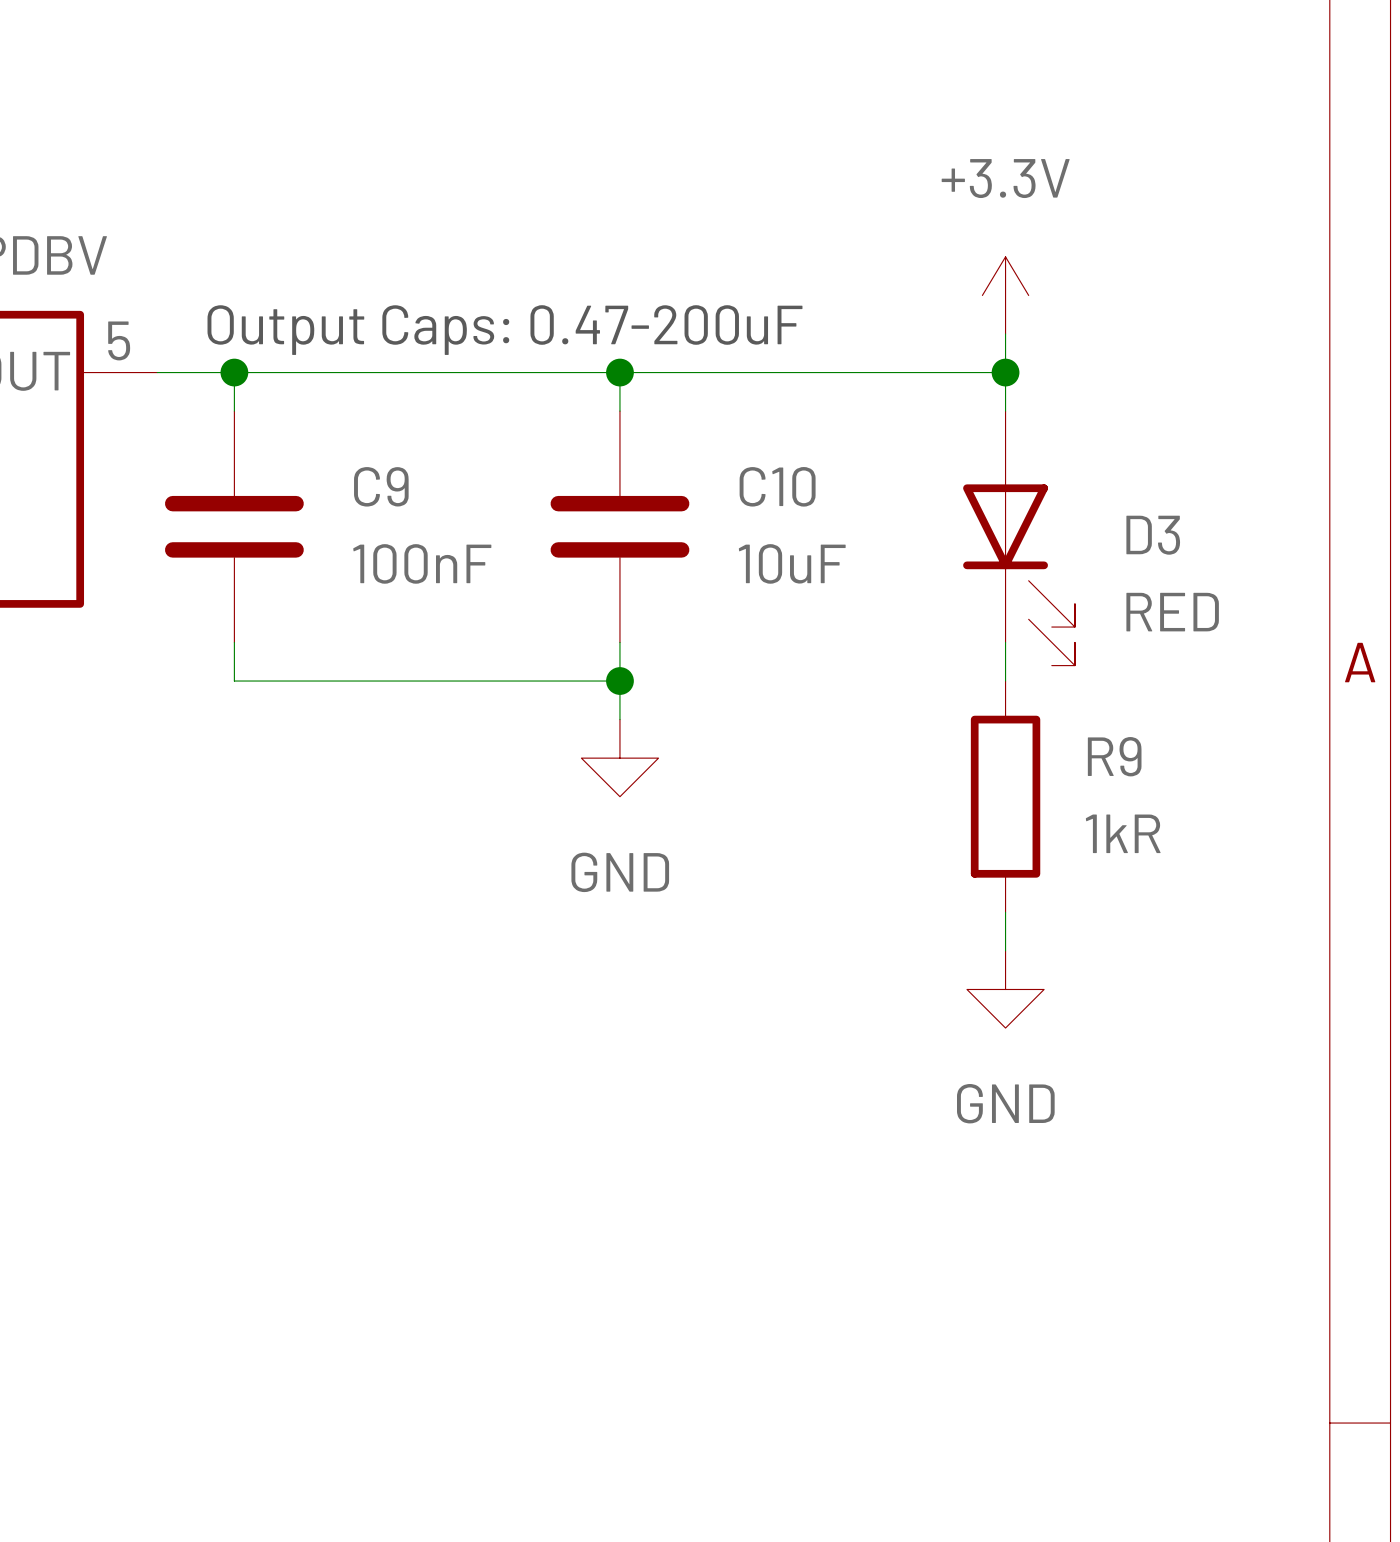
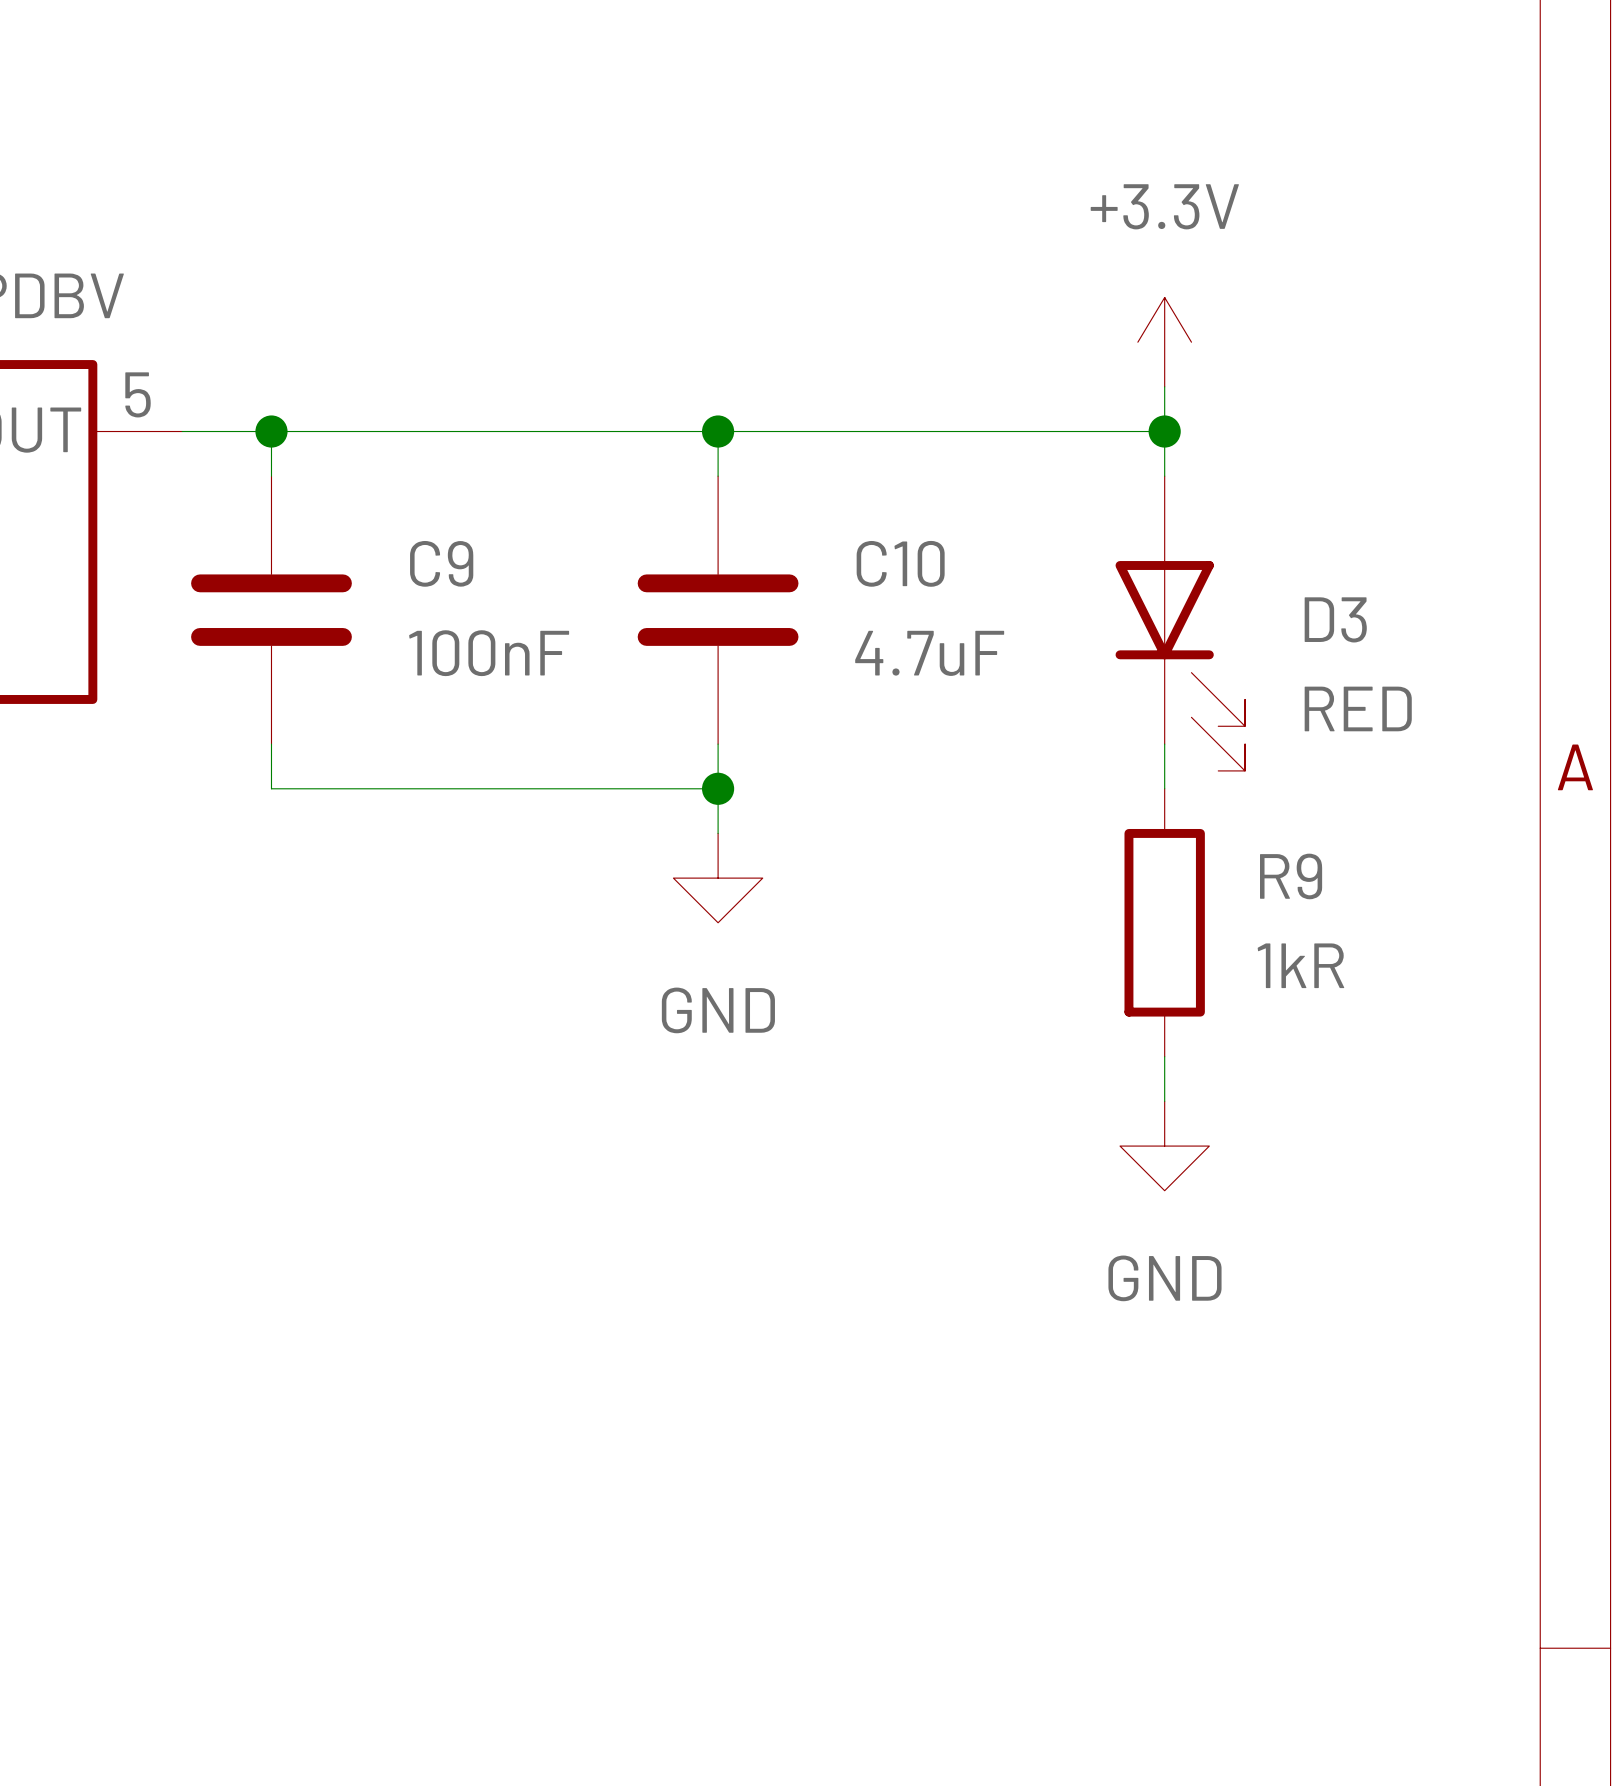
text: Output Caps: 0.47-200uF (504, 330) -> none
C10 value: 10uF (792, 563) -> 4.7uF (929, 653)

